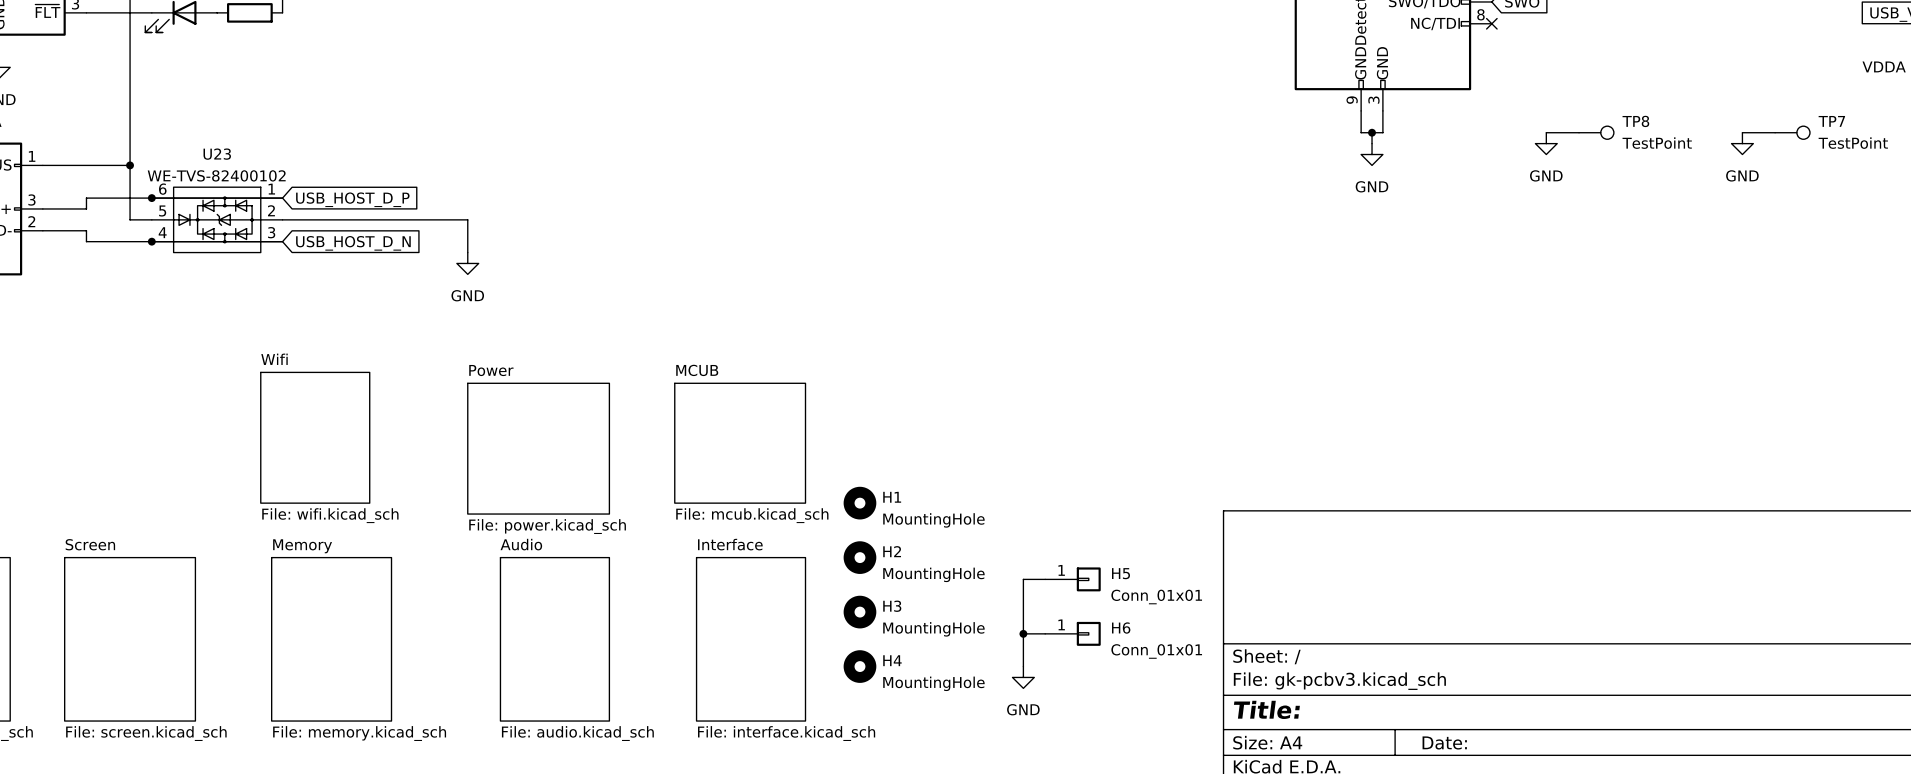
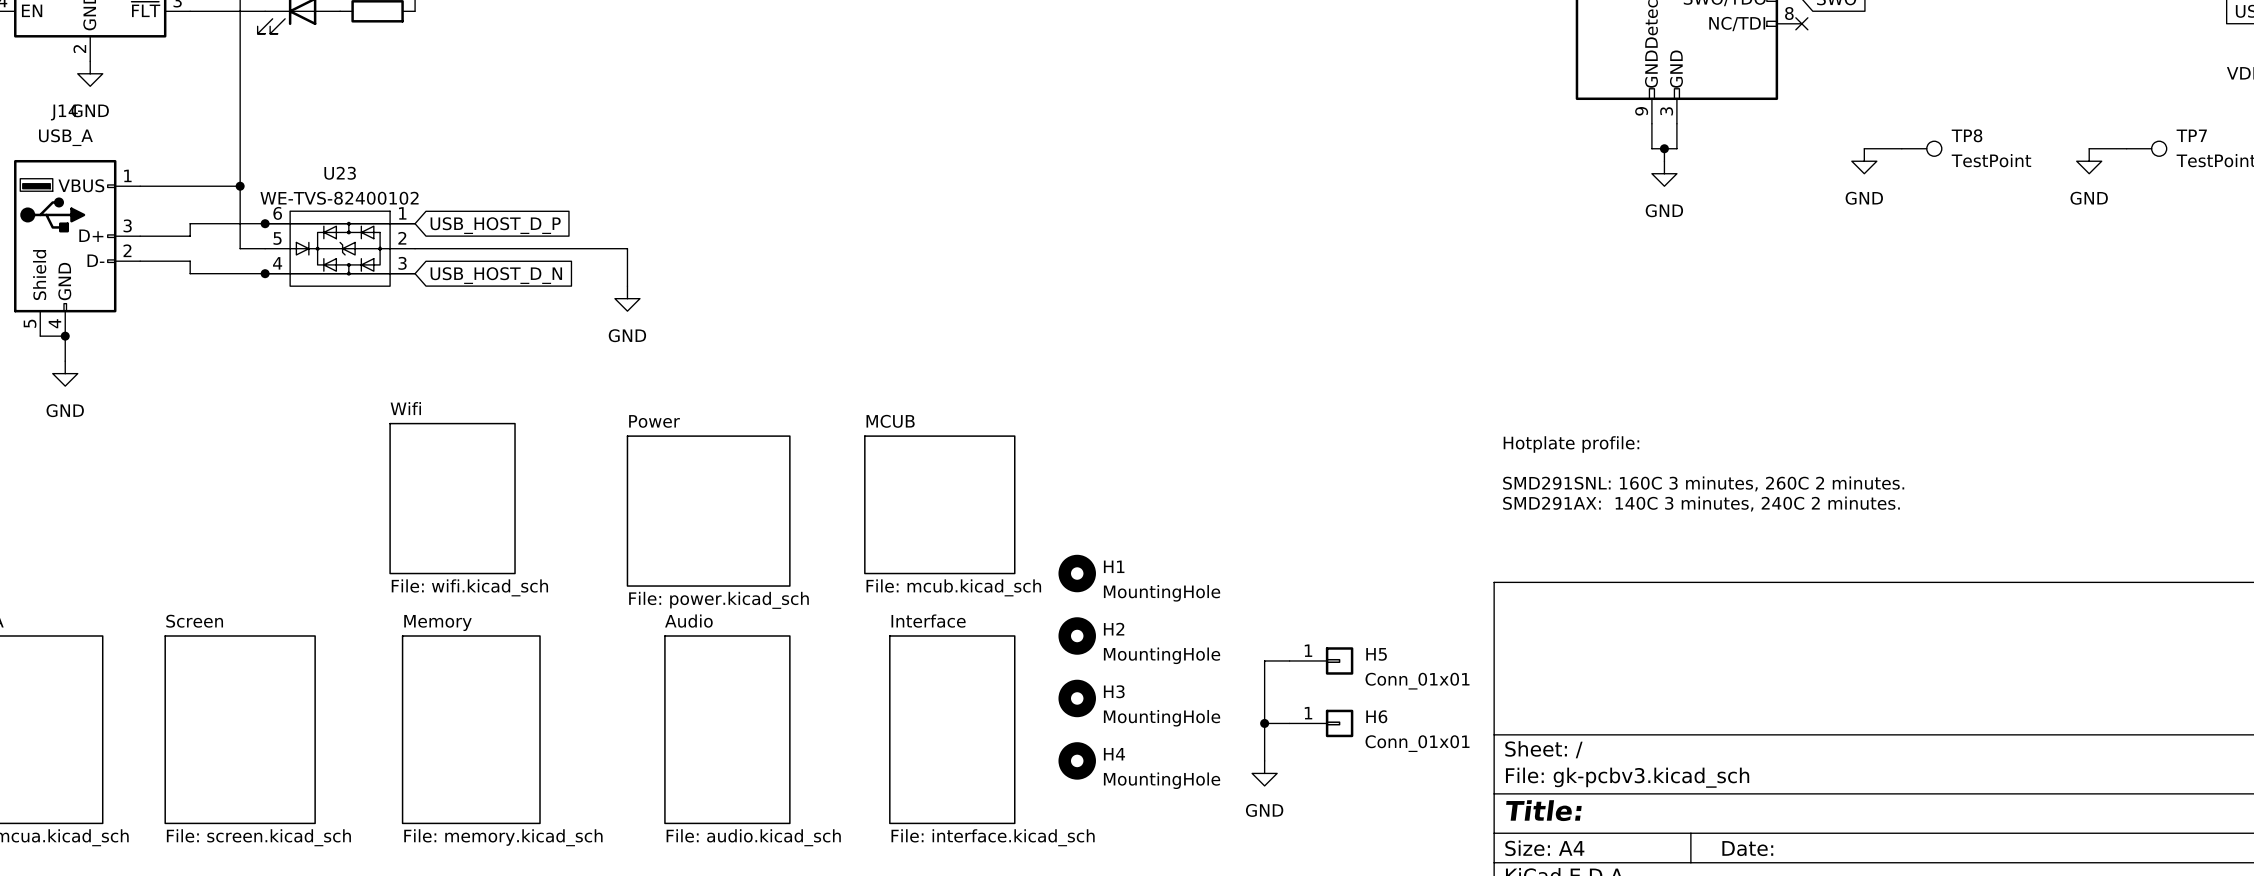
text: none -> Hotplate profile: (1571, 444)
text: none -> SMD291SNL: 160C 3 minutes, 260C 2 minutes. (1703, 483)
text: none -> SMD291AX: 140C 3 minutes, 240C 2 minutes. (1701, 504)

